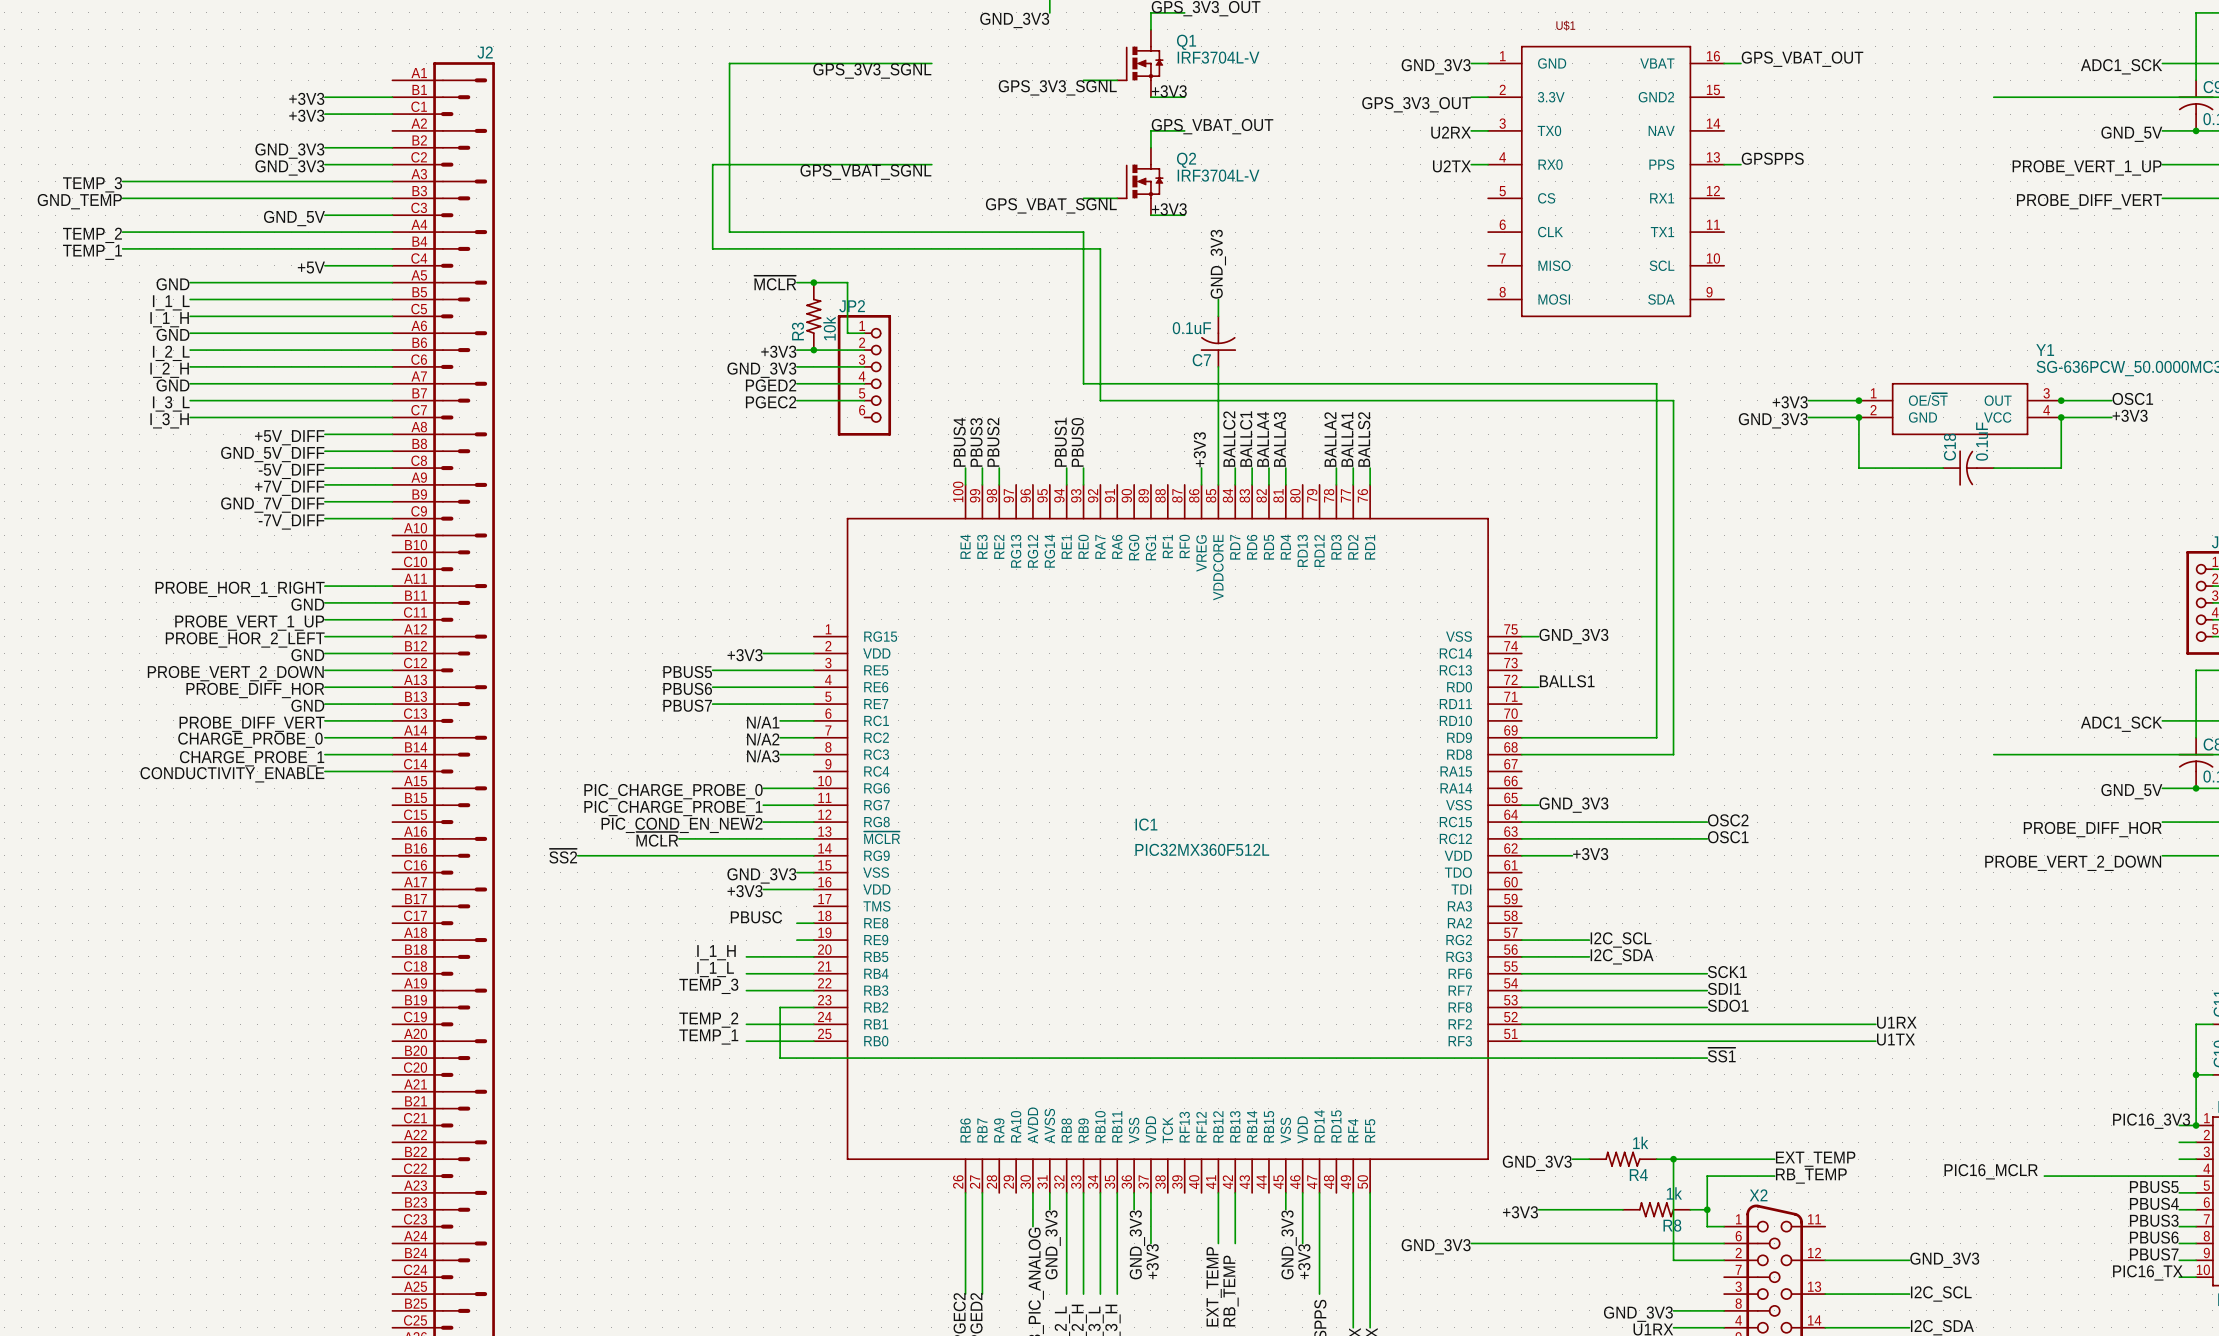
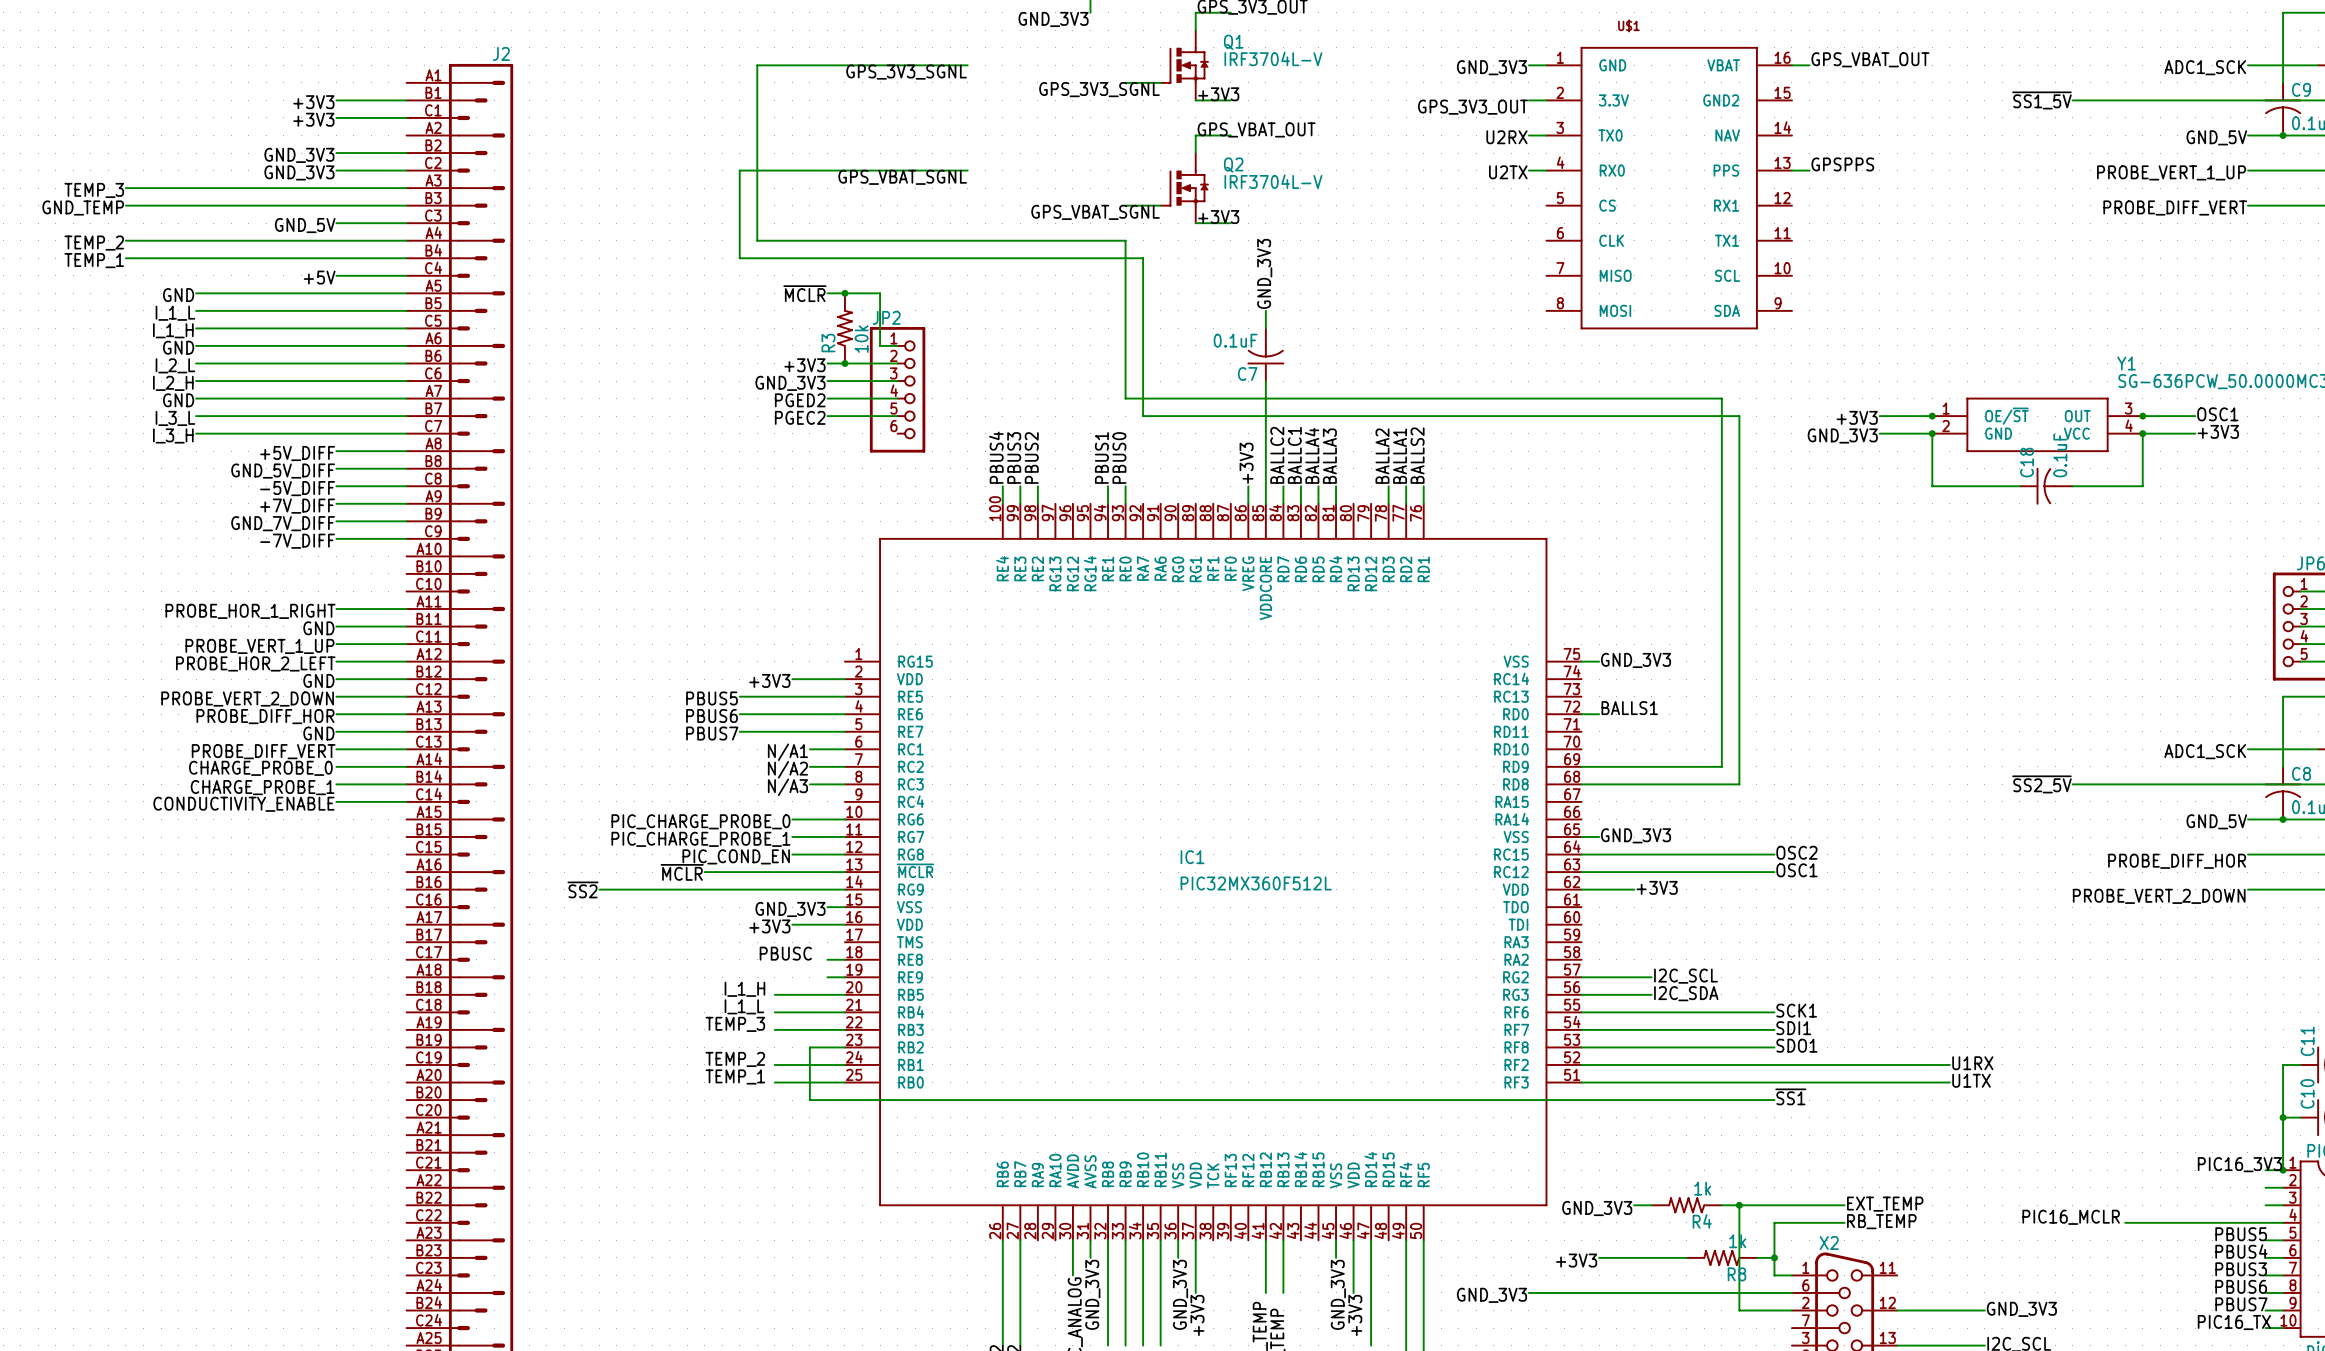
label: none -> ~{SS1_5V} (2041, 100)
label: none -> ~{SS2_5V} (2041, 784)
label: PIC_COND_EN_NEW2 (682, 825) -> PIC_COND_EN (736, 856)

